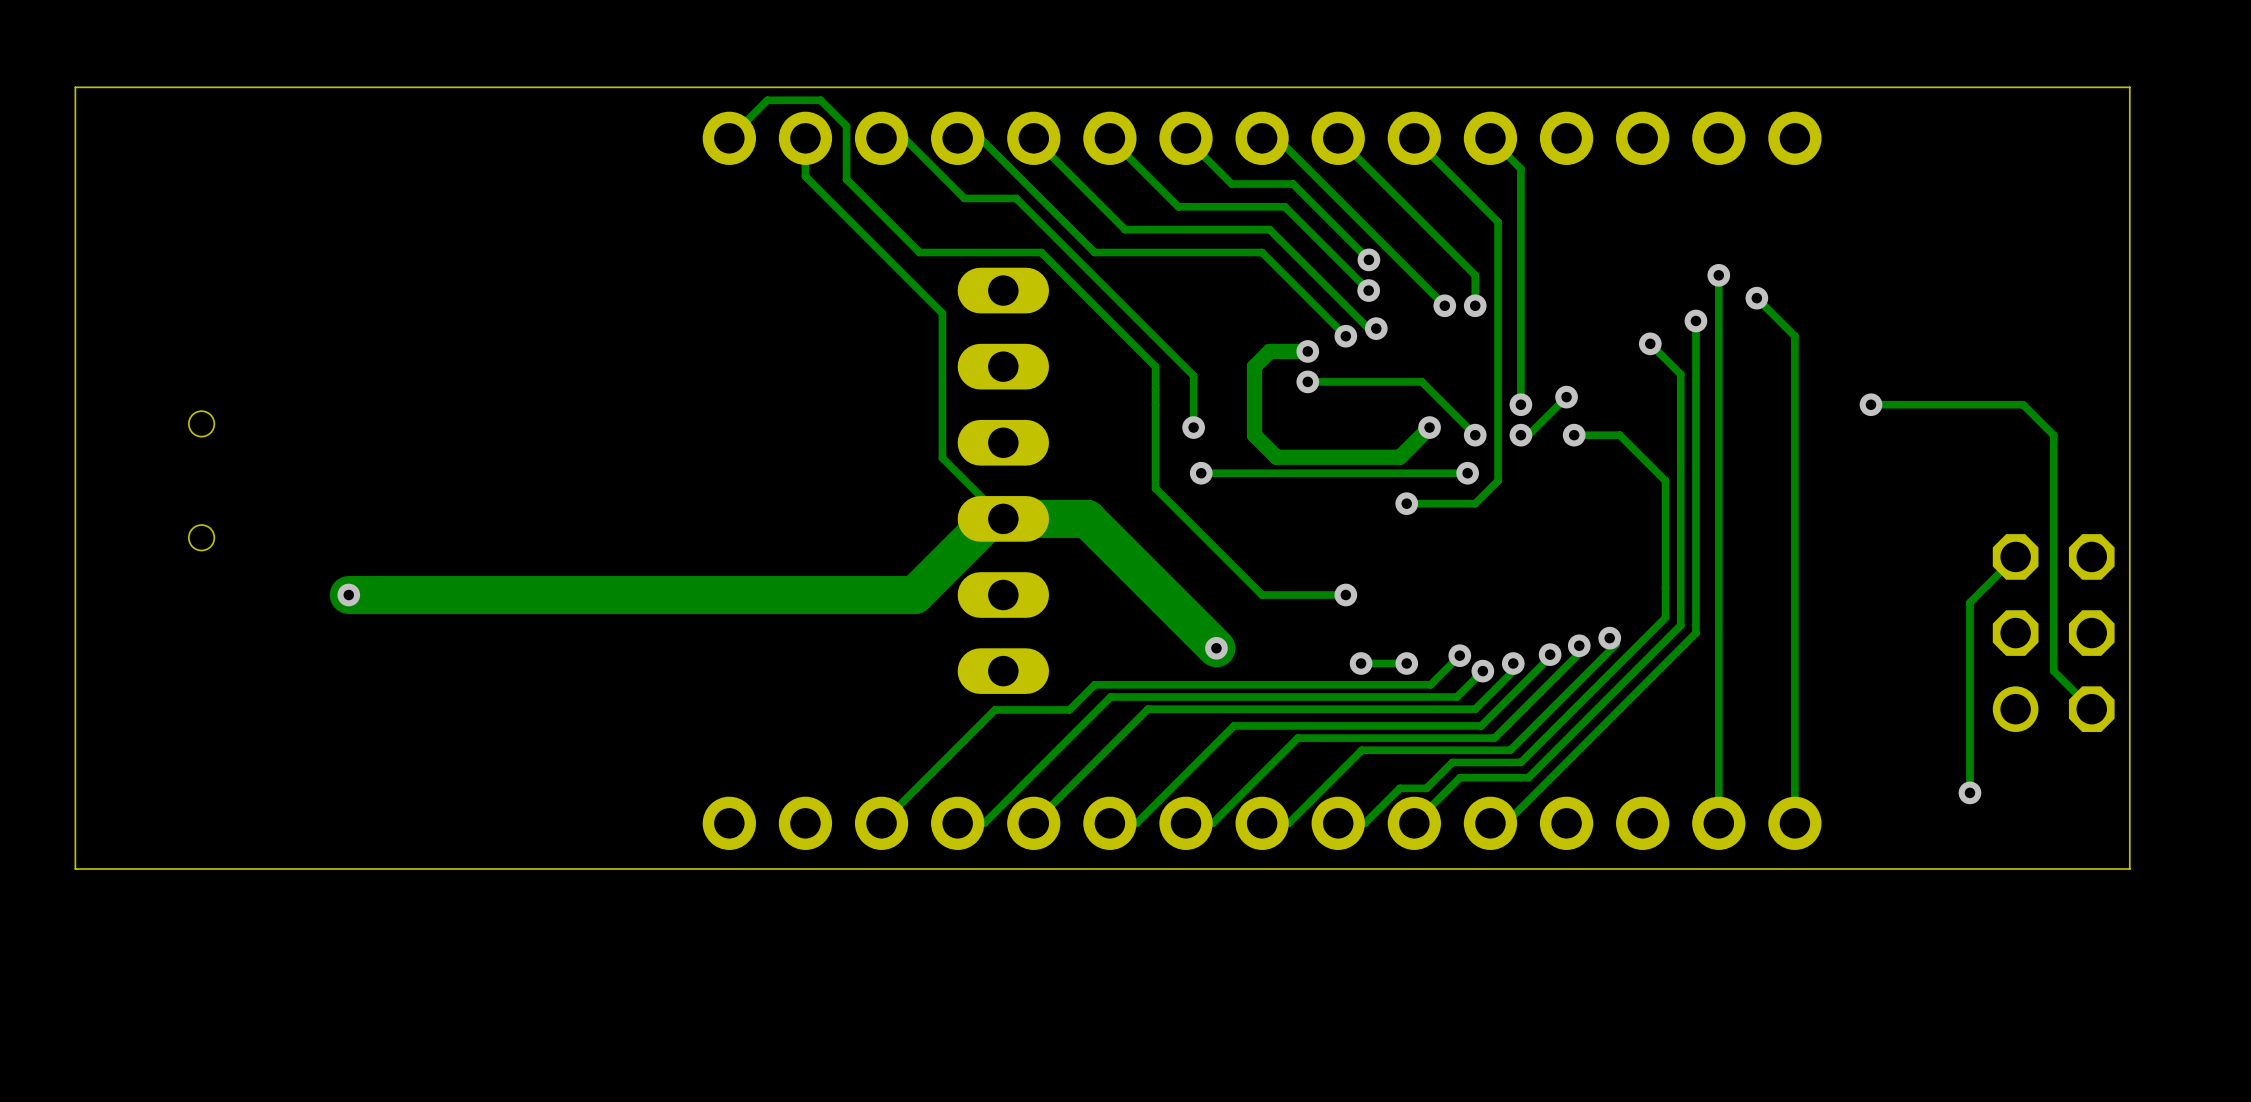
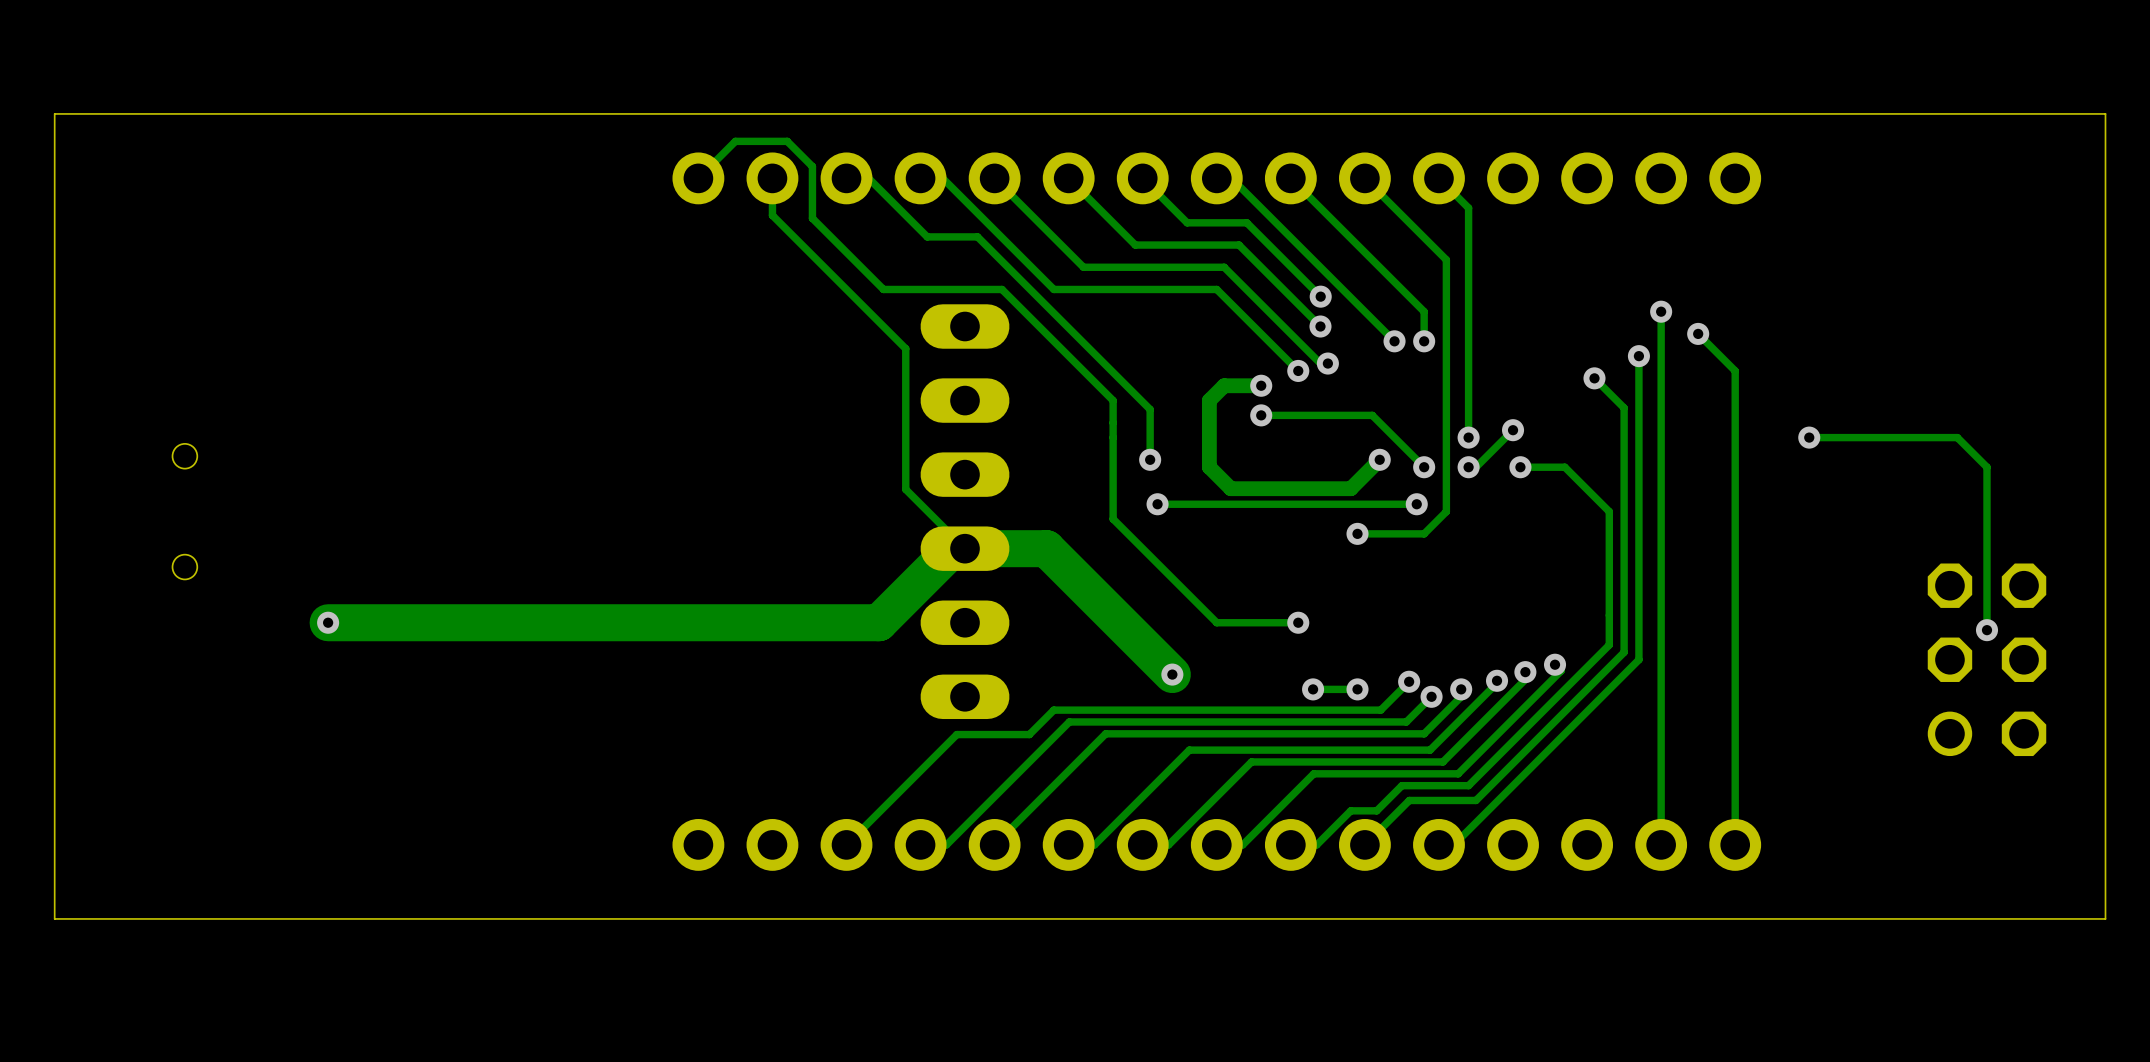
board edge: (2129, 87) (75, 87) (75, 869) (2129, 869) (2129, 87) -> (2105, 113) (2105, 918) (54, 918) (54, 113) (2105, 113)
track: (2015, 556) (1969, 602) (1969, 792) -> none
track: (2053, 602) (2053, 671) (2091, 709) -> none
via: none -> (1987, 630)
via: (1969, 792) -> none

